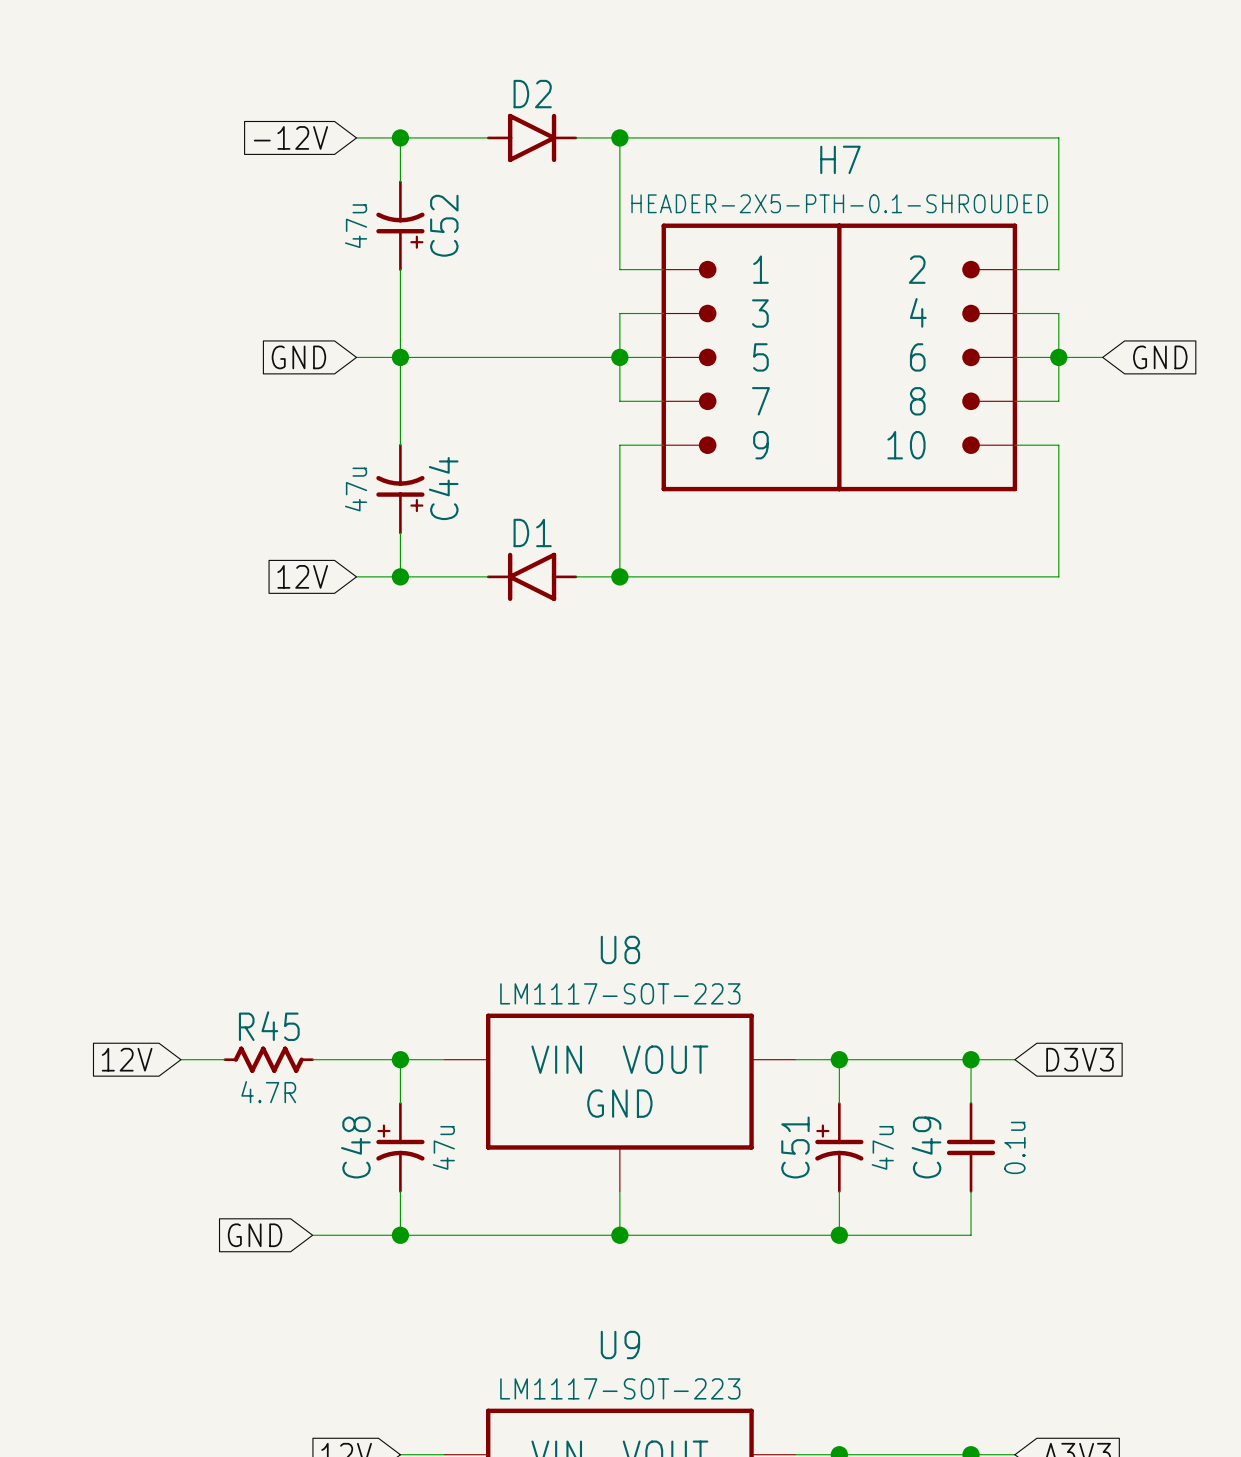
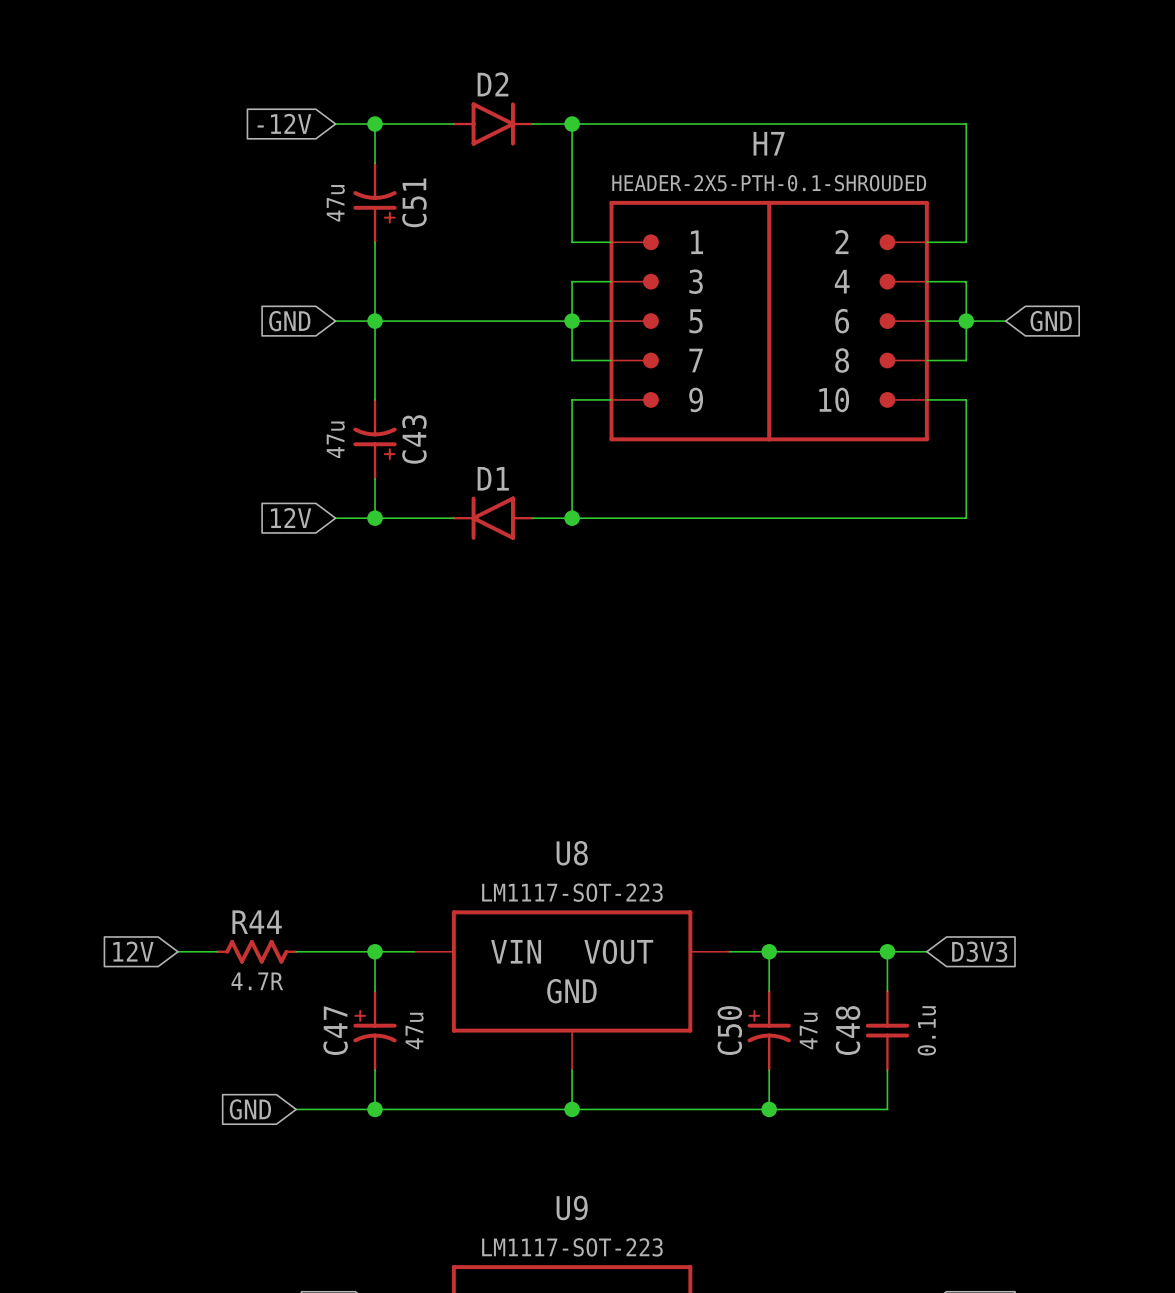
C52 name: C52 (444, 225) -> C51 (414, 202)
C44 name: C44 (443, 488) -> C43 (414, 439)
R45 name: R45 (269, 1026) -> R44 (257, 922)
C48 name: C48 (355, 1147) -> C47 (335, 1030)
C51 name: C51 (795, 1147) -> C50 (729, 1030)
C49 name: C49 (926, 1147) -> C48 (848, 1030)

